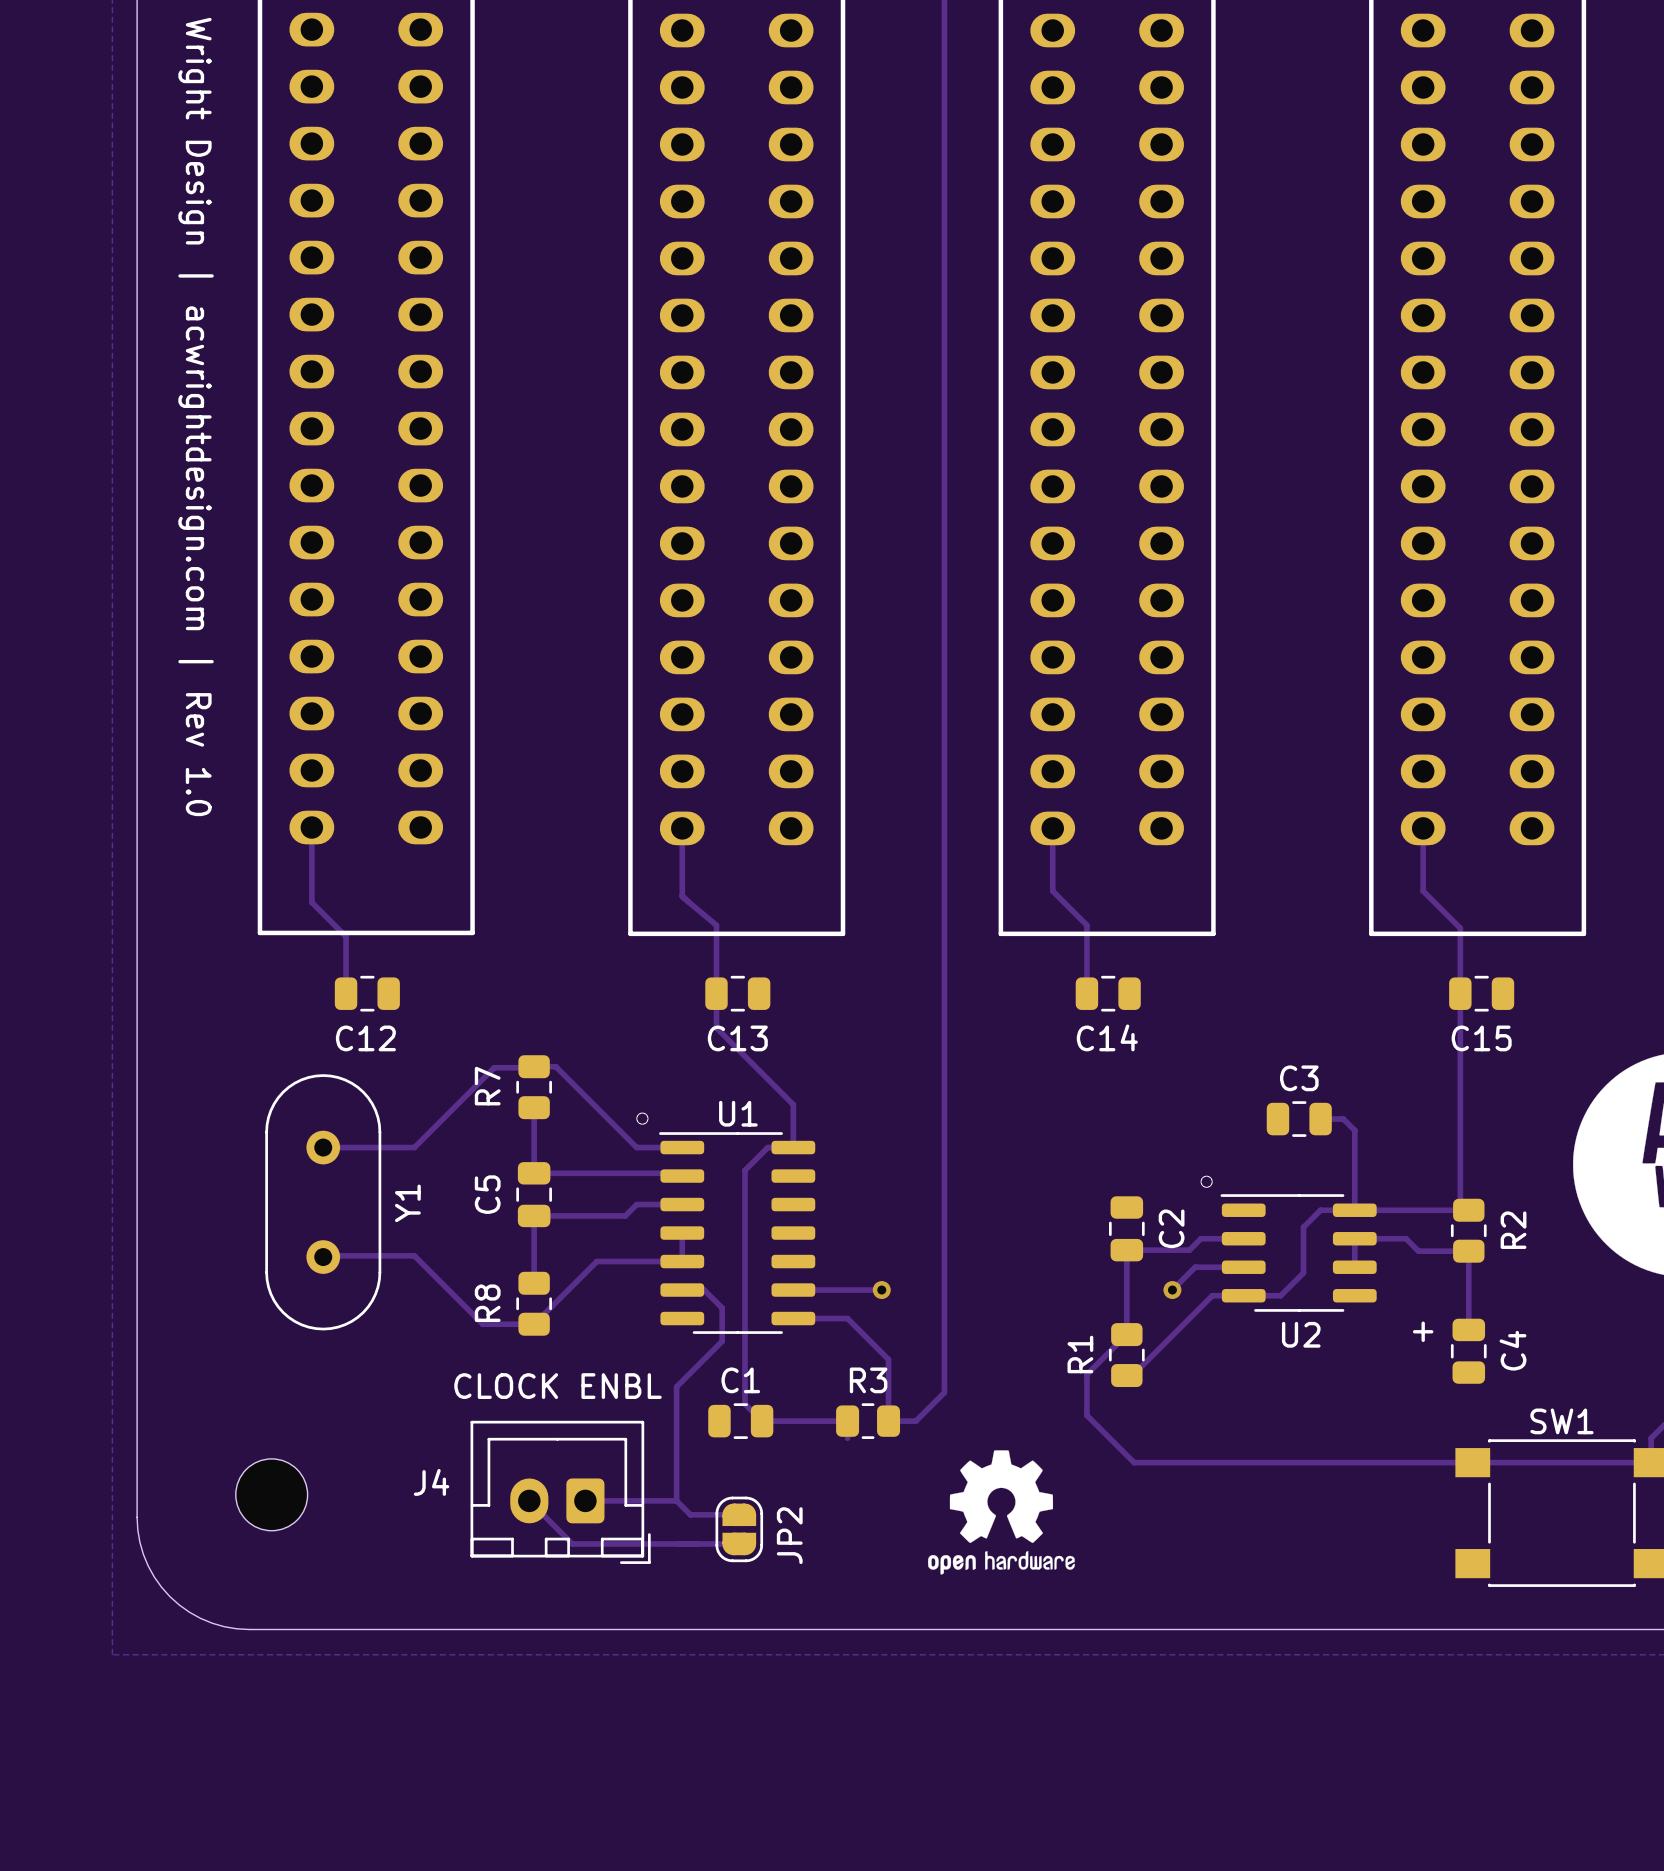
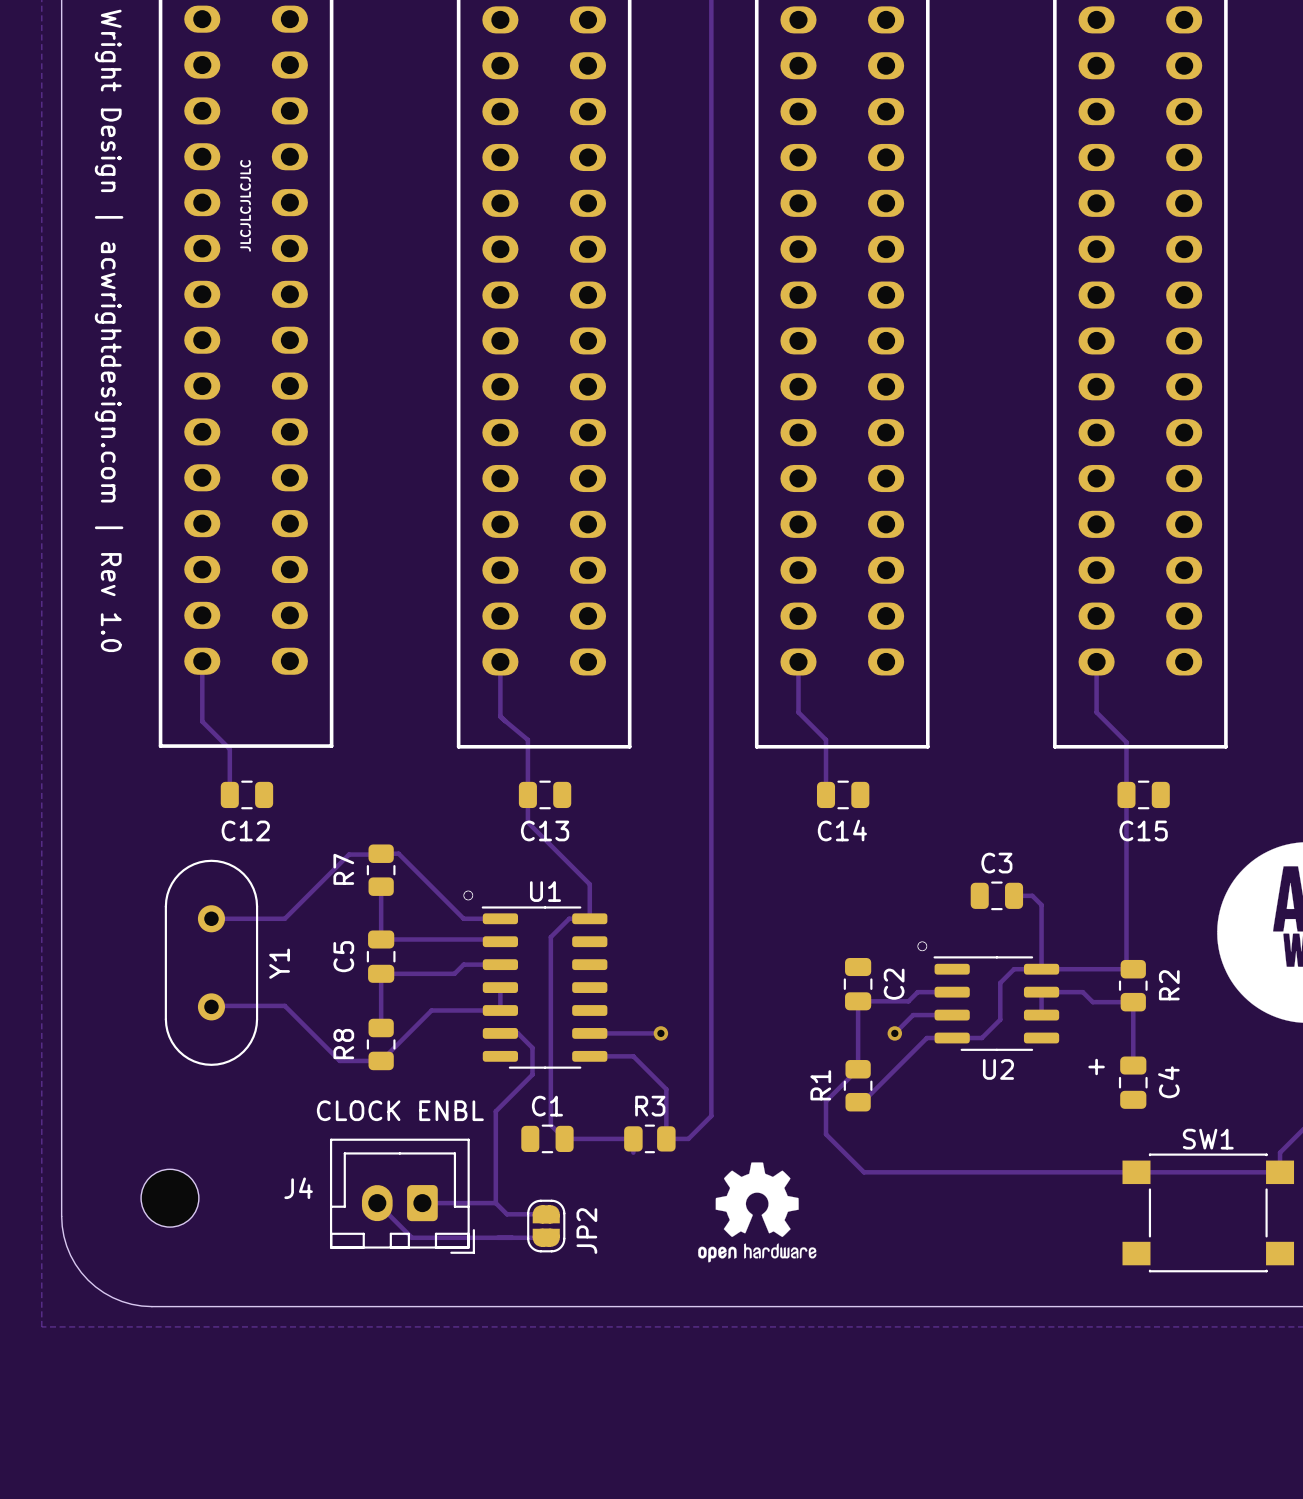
text: none -> JLCJLCJLCJLC (245, 205)

